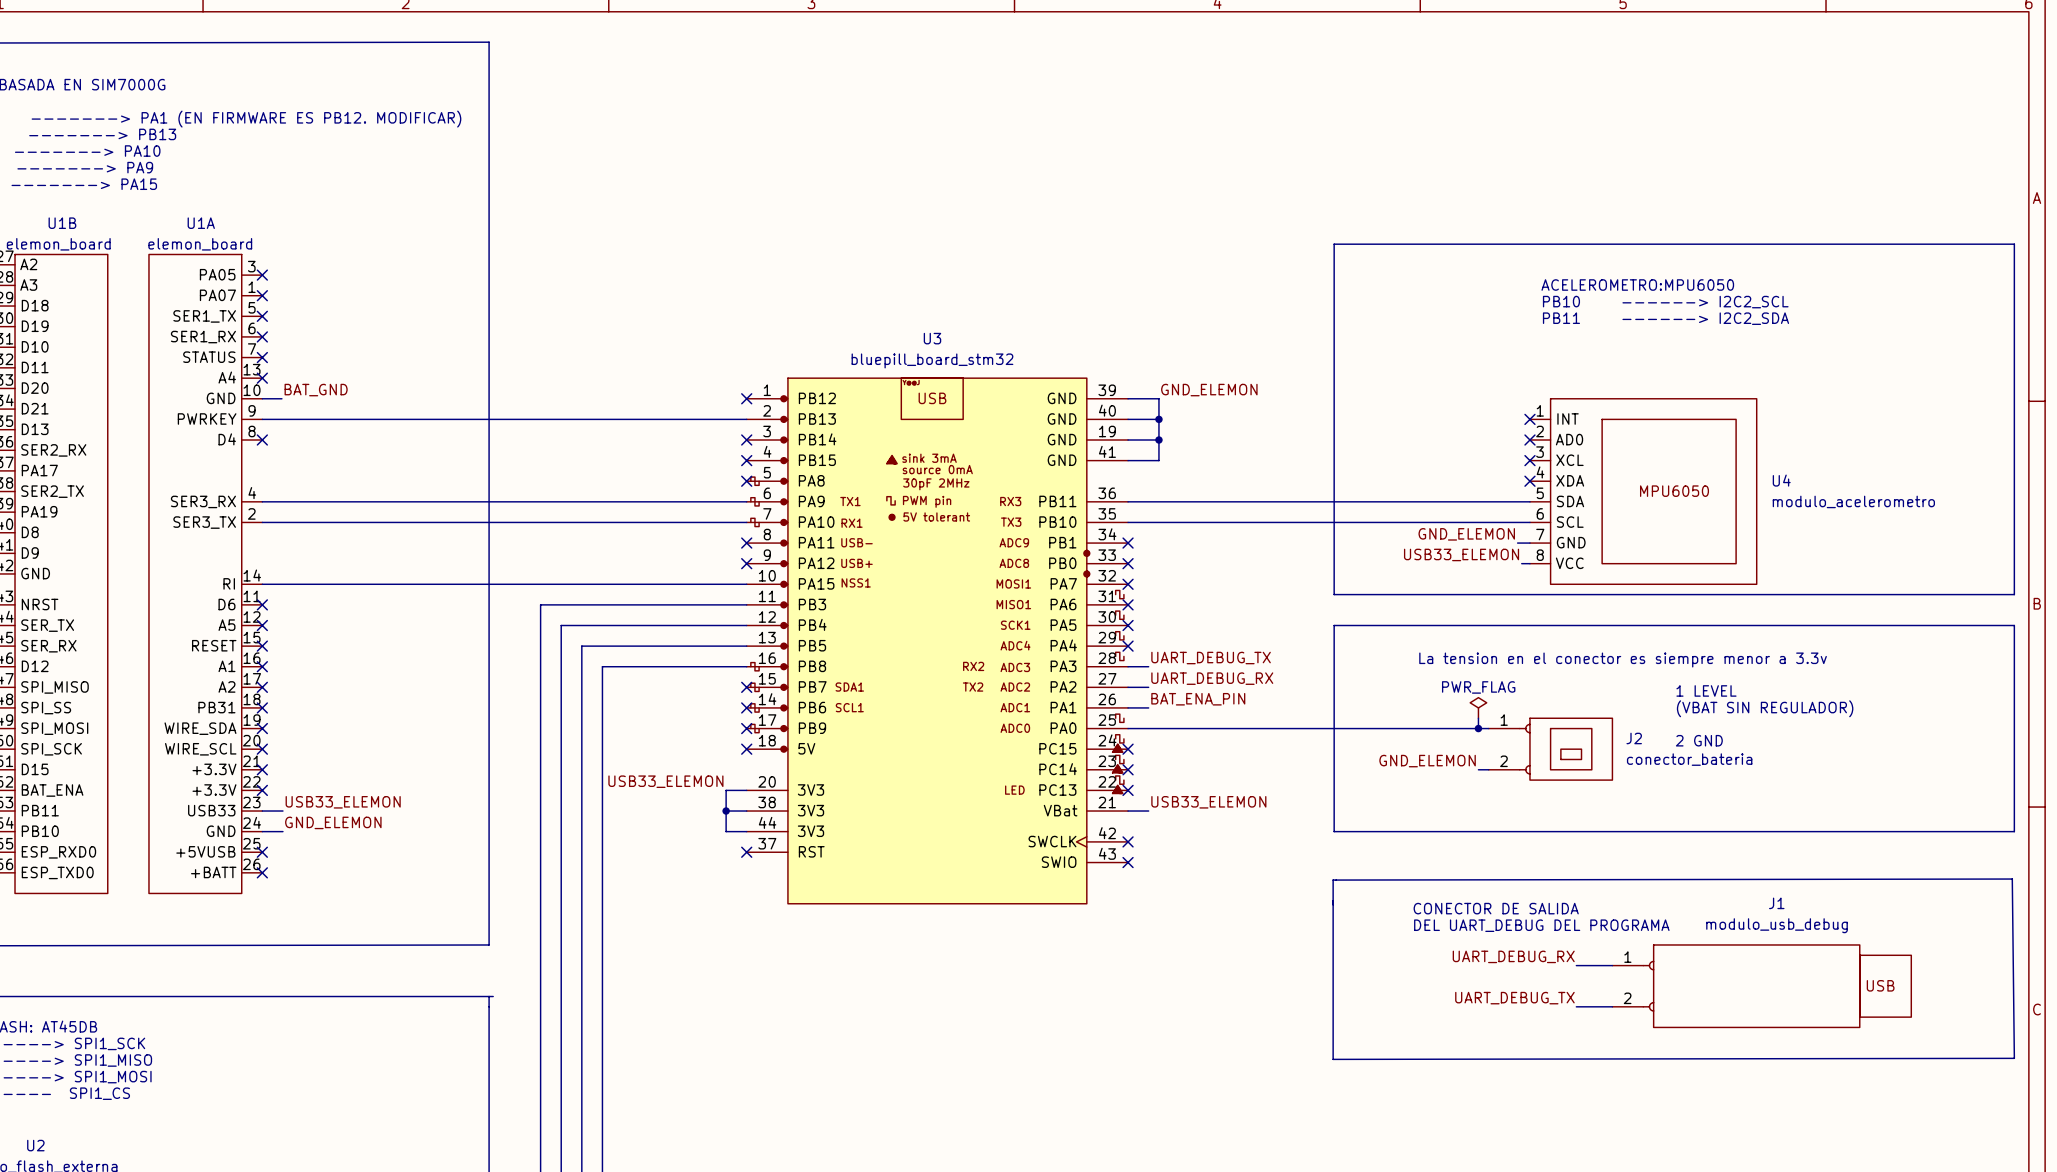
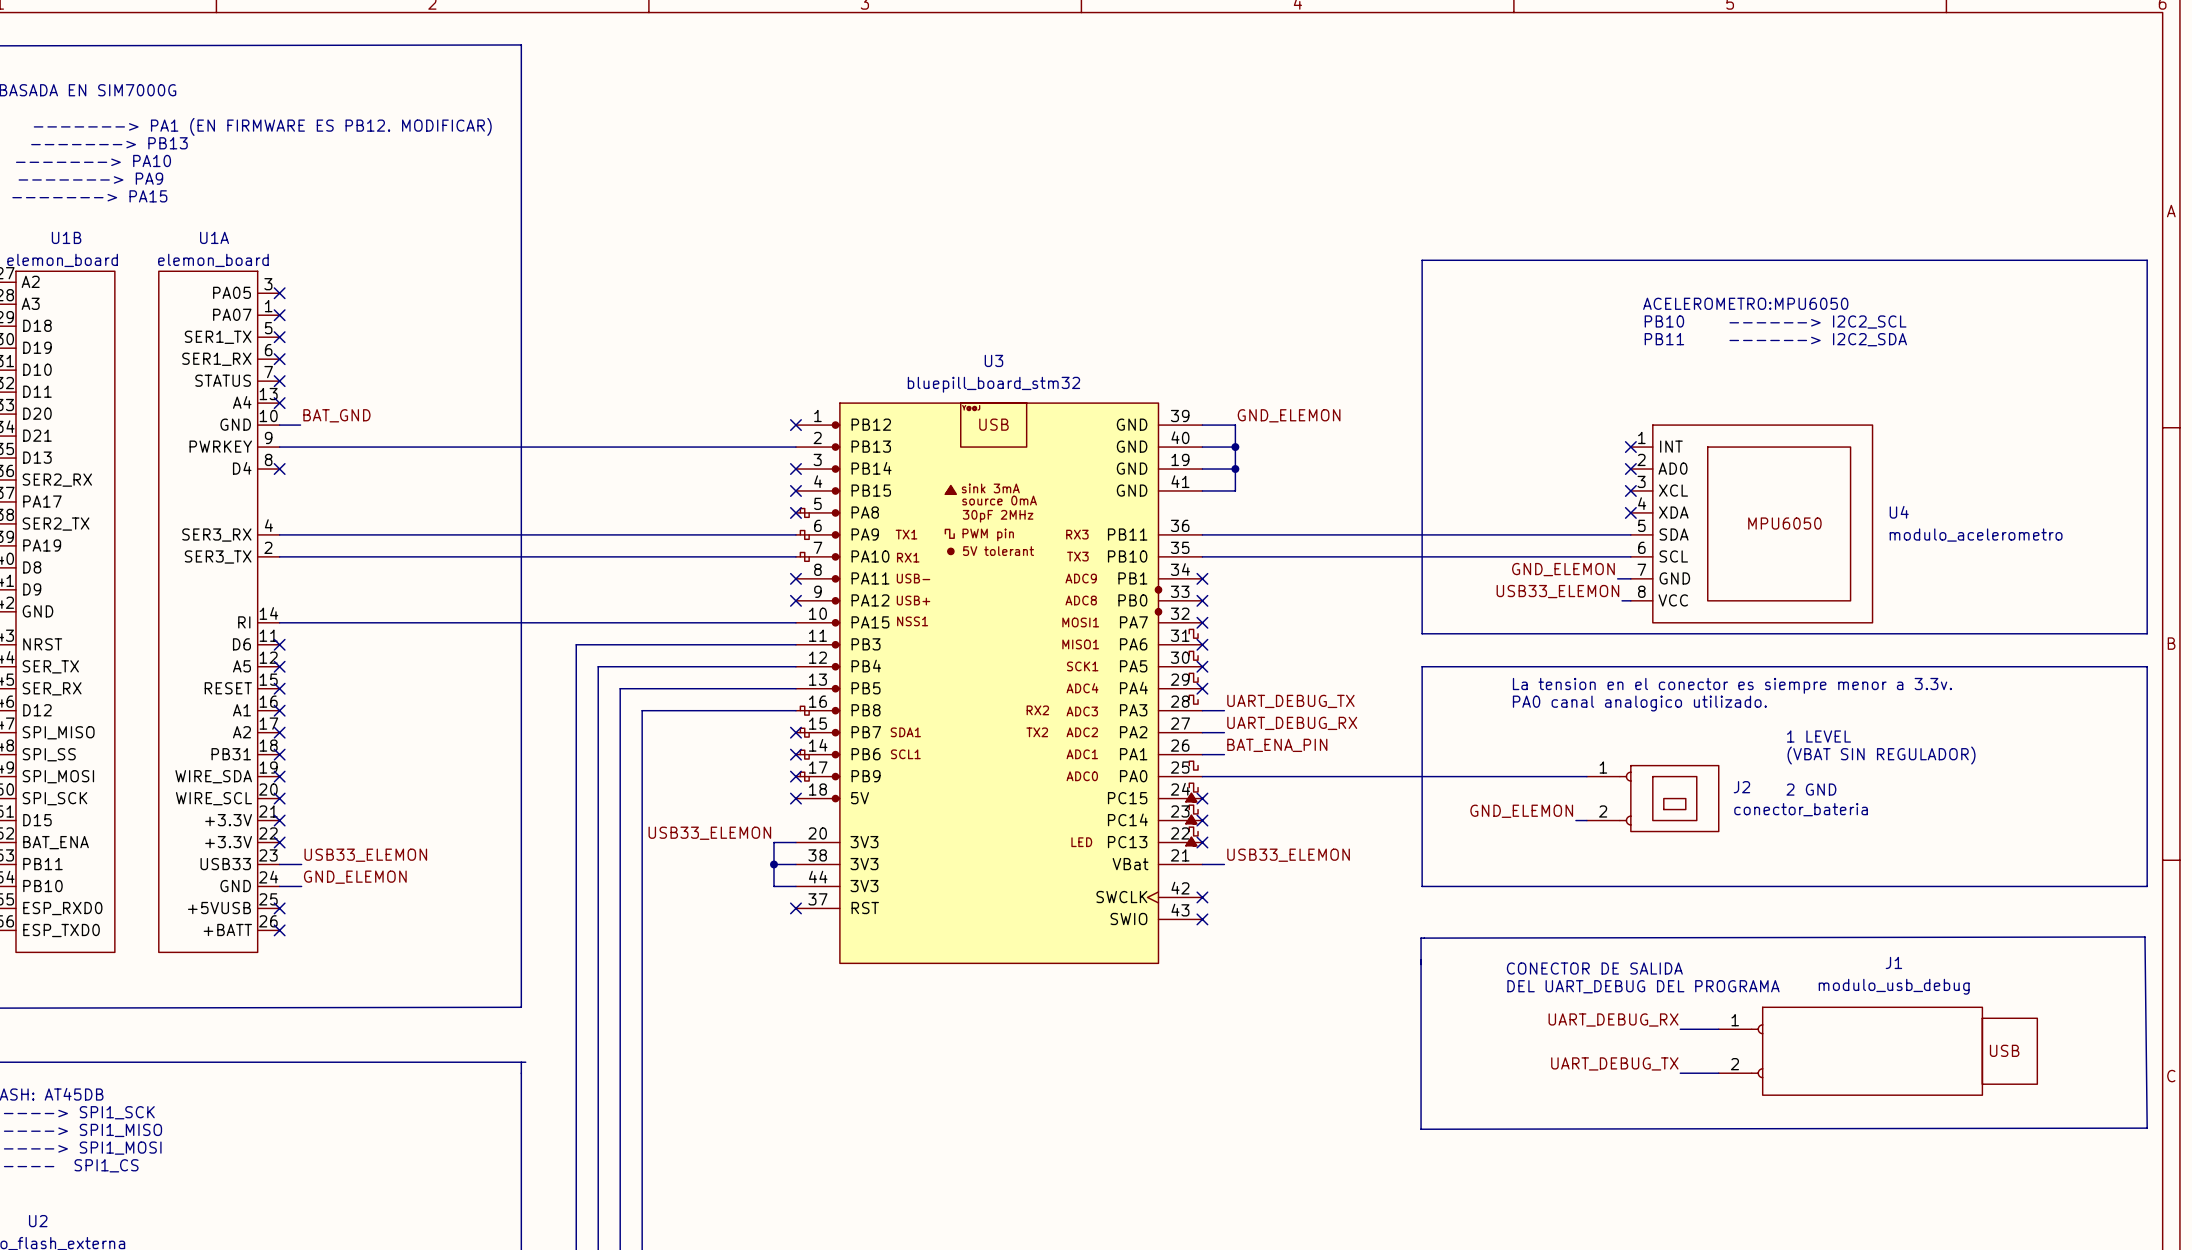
text: none -> La tension en el conector es siempre menor a 3.3v. (1732, 685)
text: La tension en el conector es siempre menor a 3.3v (1623, 660) -> PA0 canal analogico utilizado. (1639, 703)
power symbol: PWR_FLAG (1478, 707) -> none
wire: (1478, 718) (1478, 728) -> none
junction: (1478, 728) -> none

